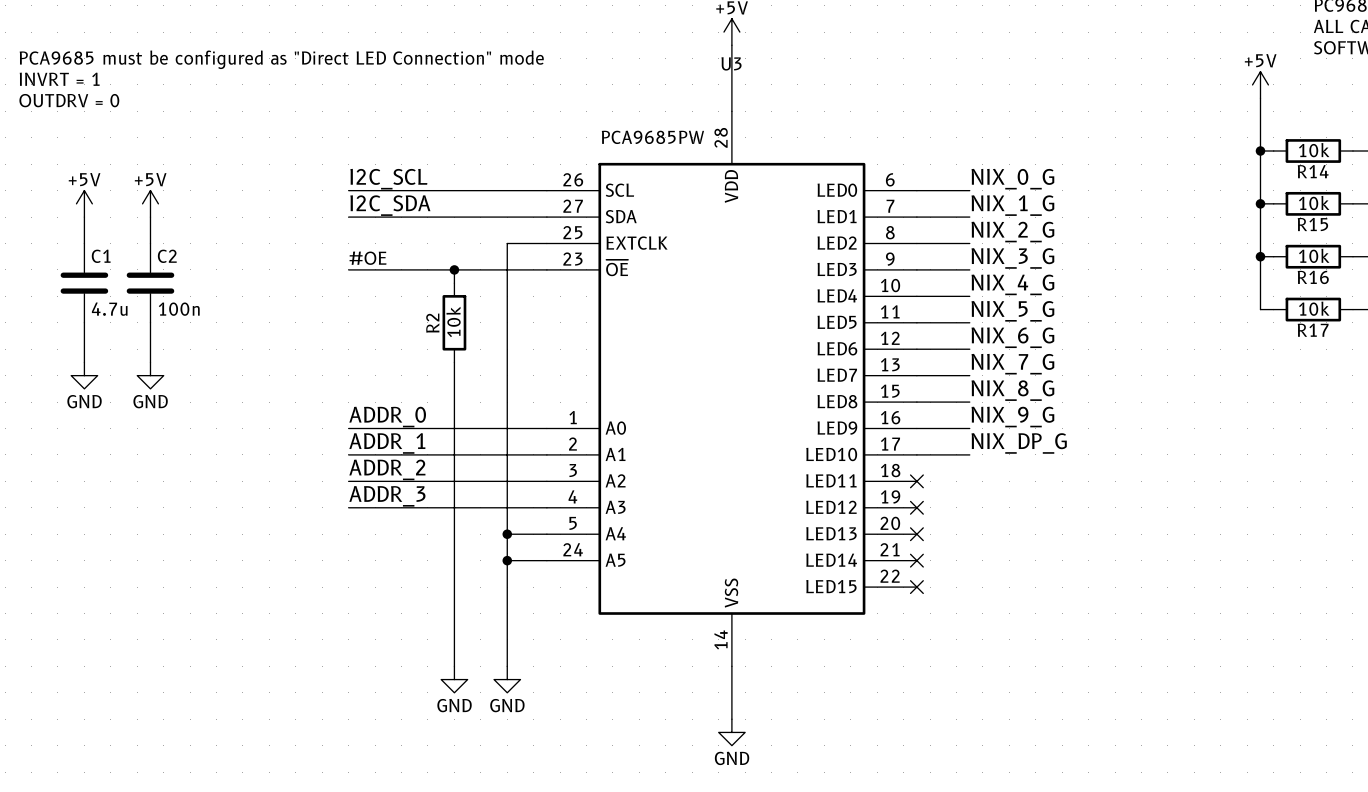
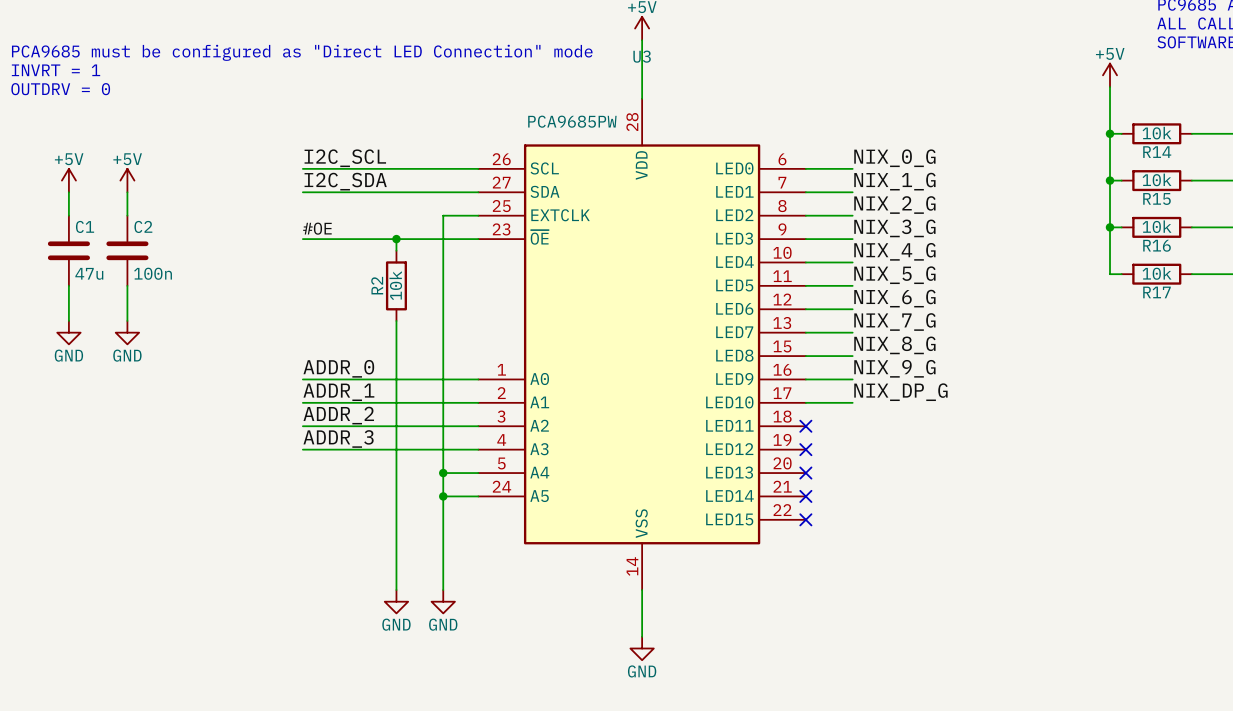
C1 value: 4.7u (109, 309) -> 47u (89, 273)

